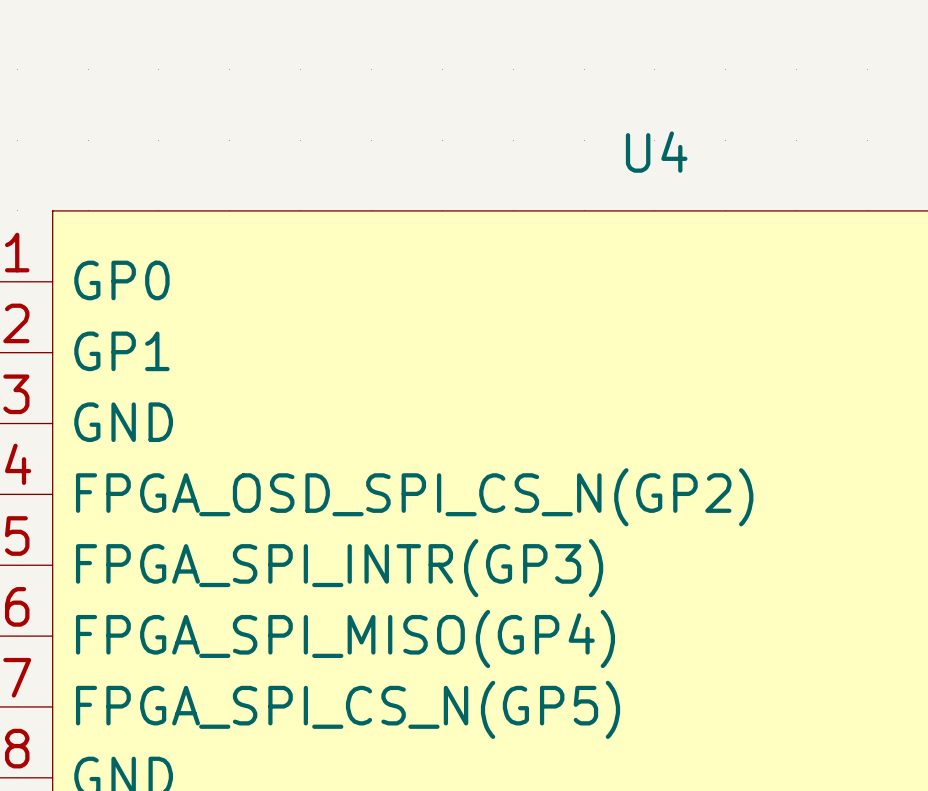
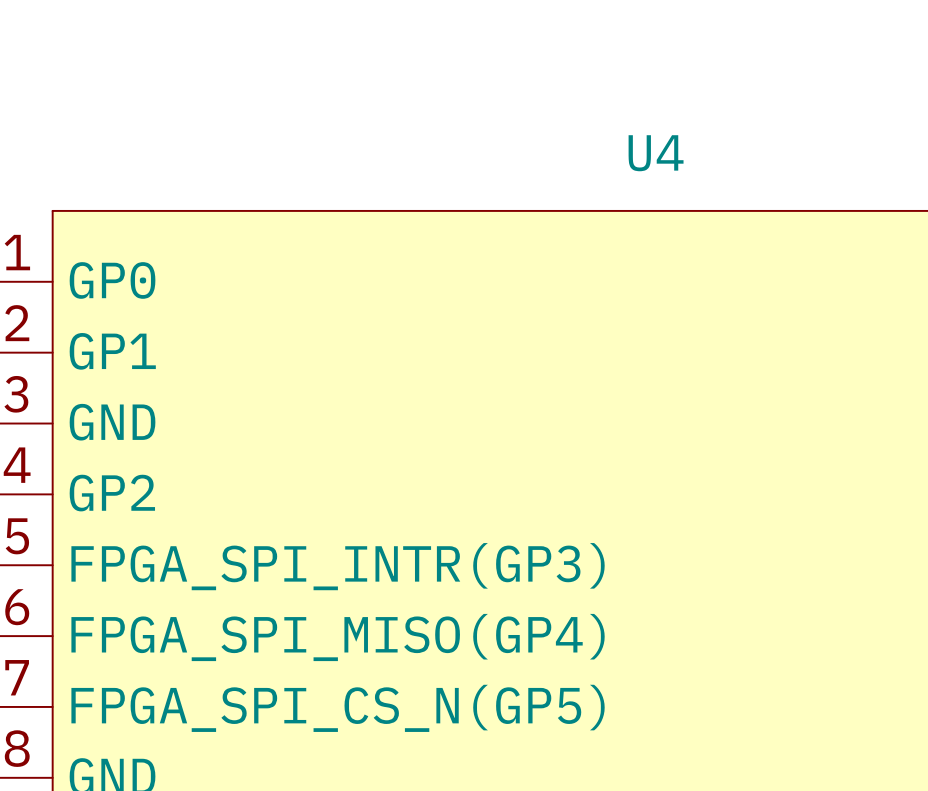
U4 pin name: FPGA_OSD_SPI_CS_N(GP2) (414, 497) -> GP2 (112, 493)

